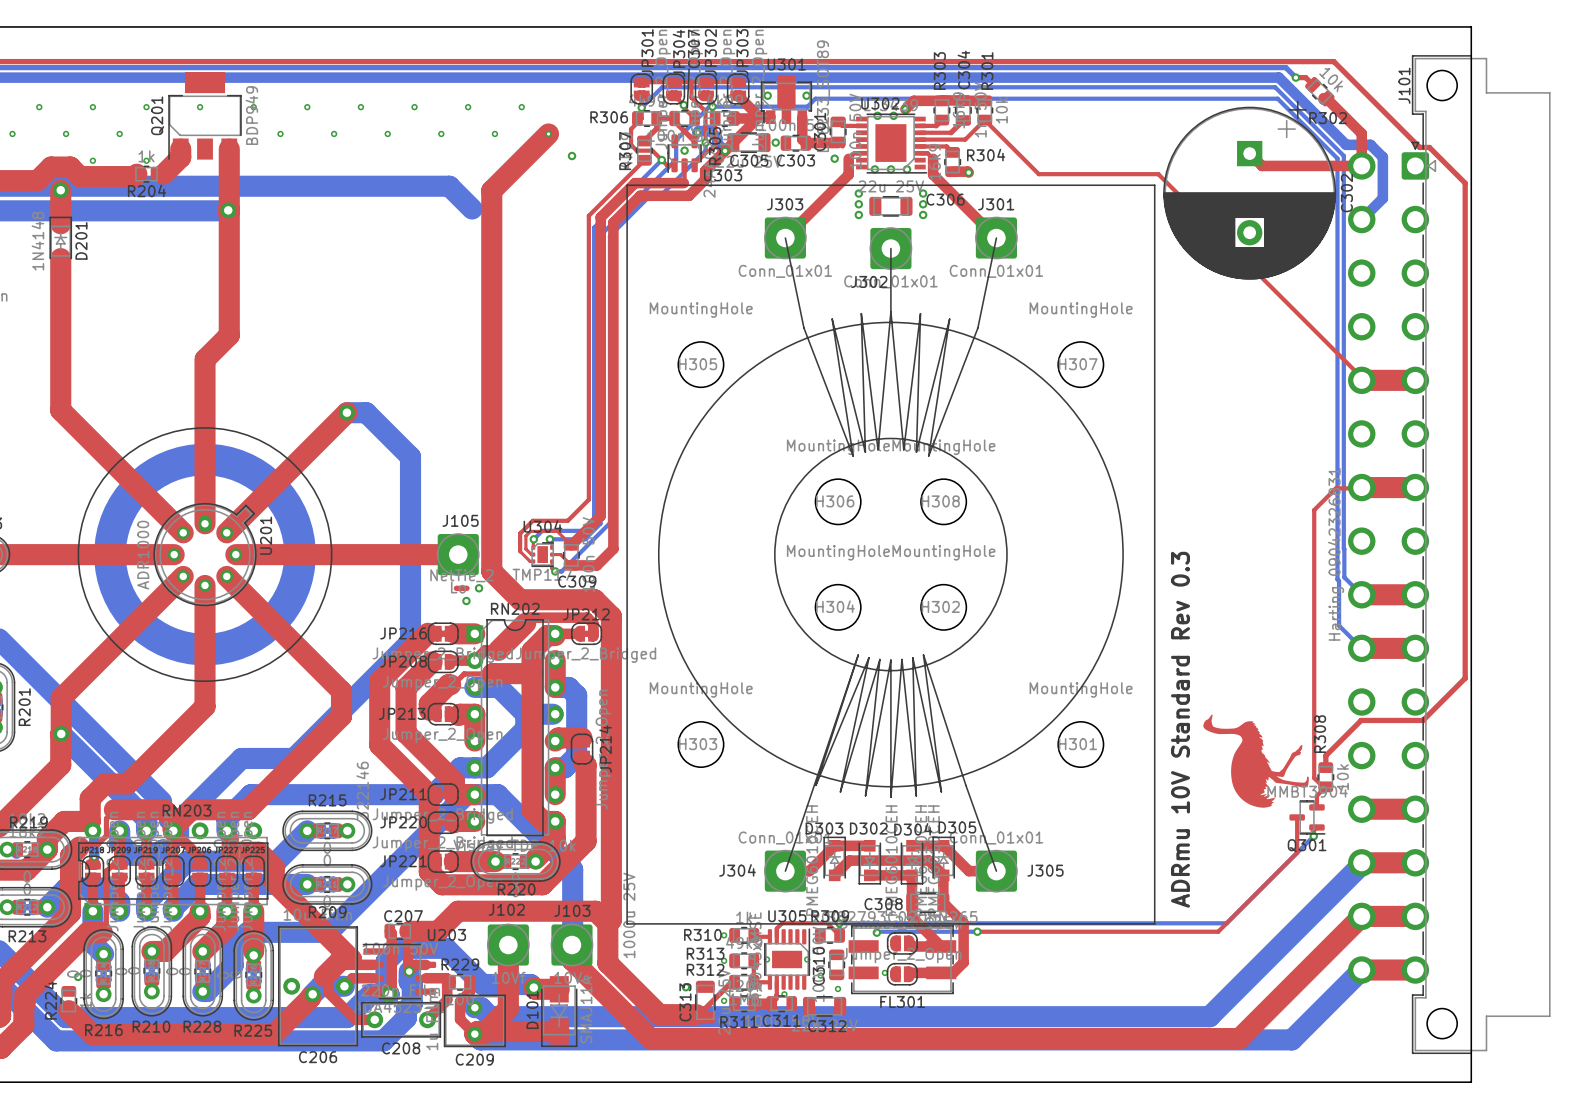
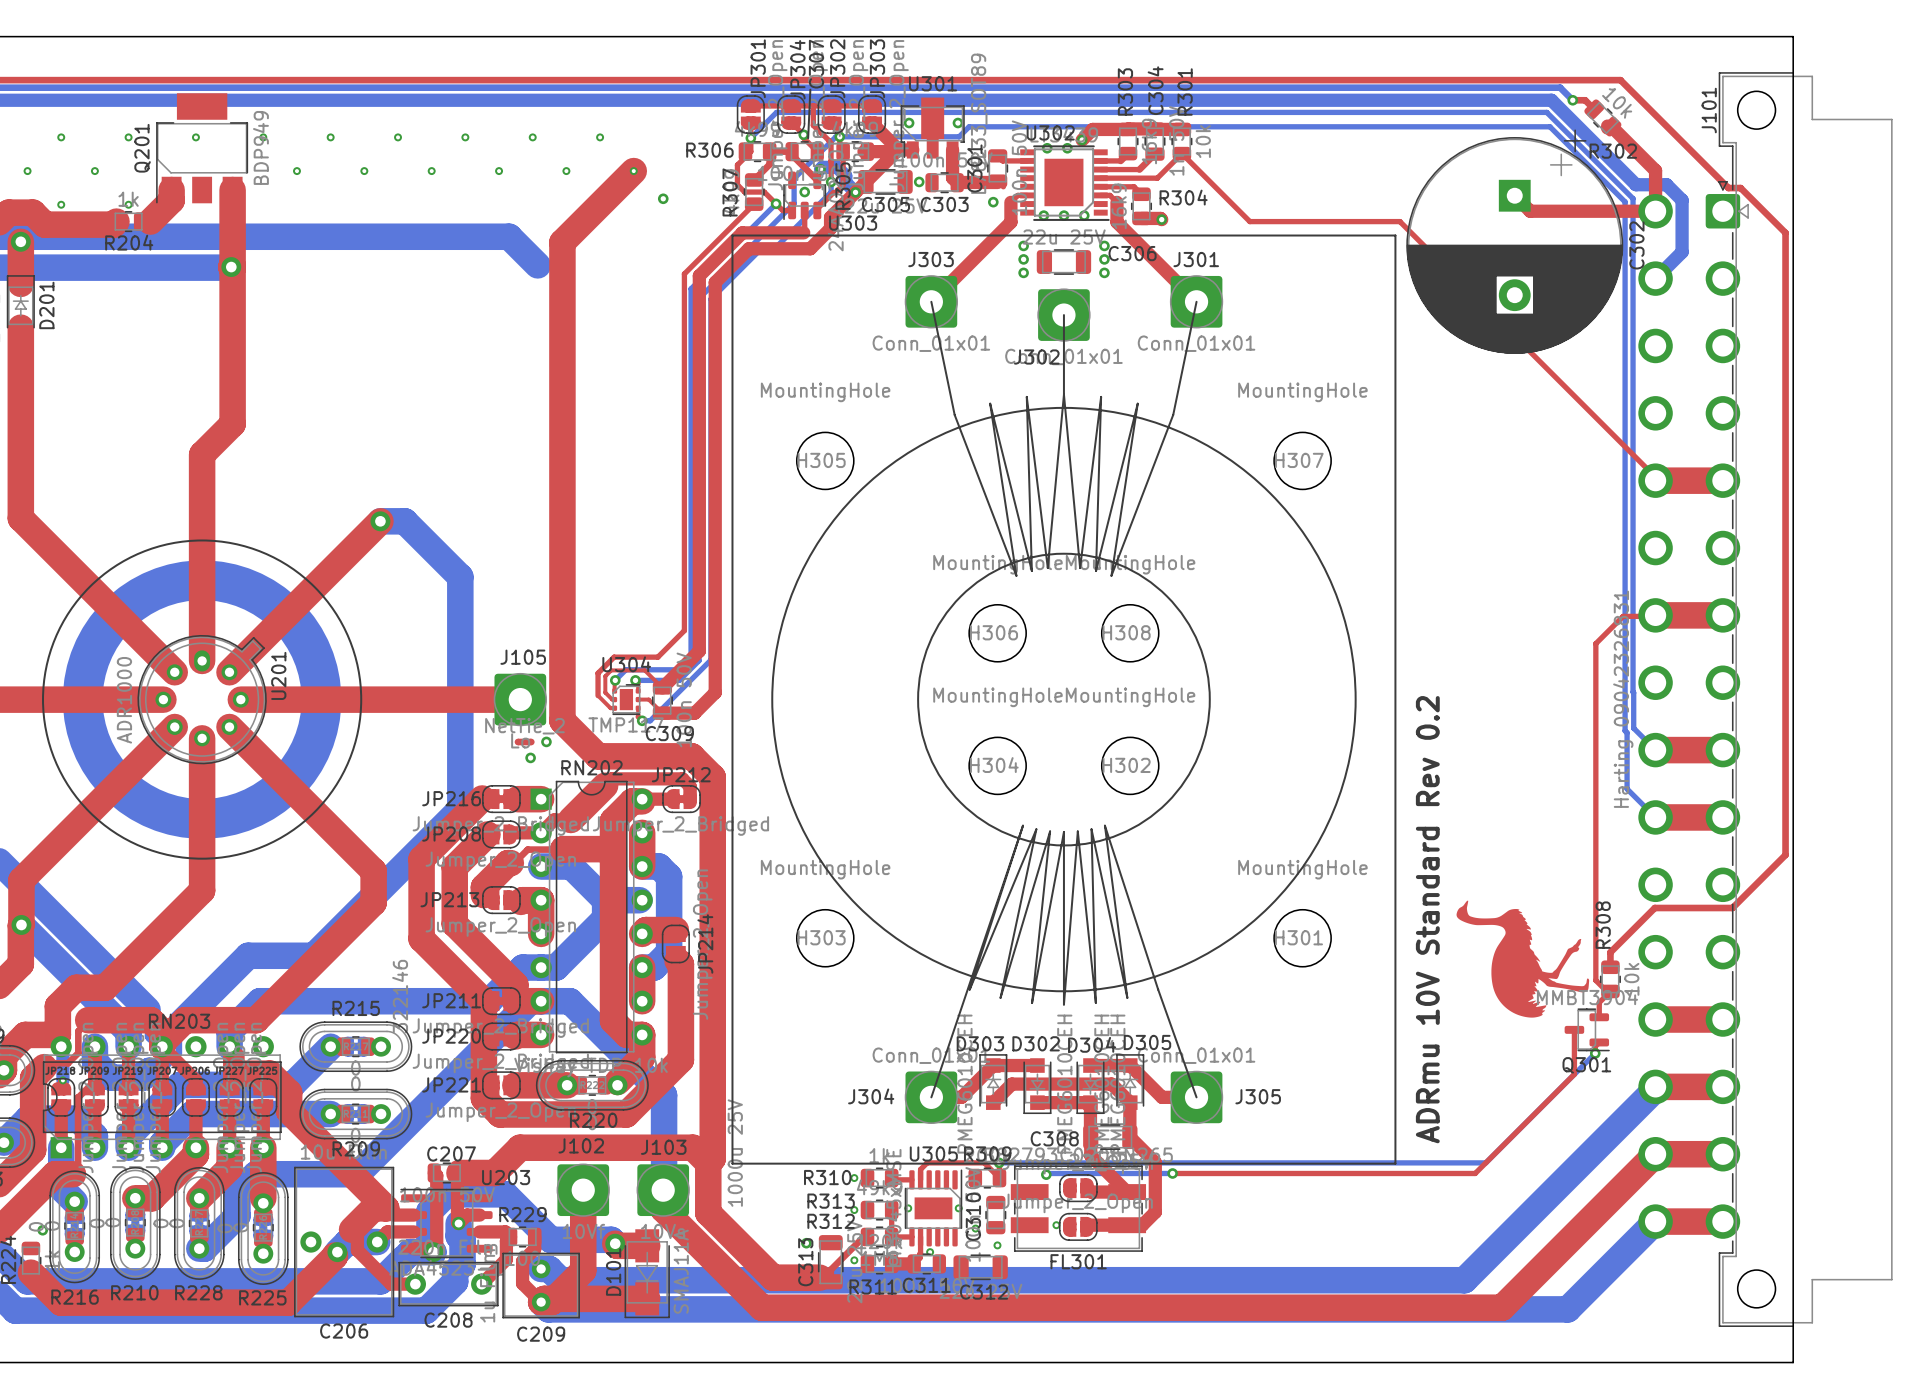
text: ADRmu 10V Standard Rev 0.3 (1180, 729) -> ADRmu 10V Standard Rev 0.2 (1427, 919)

